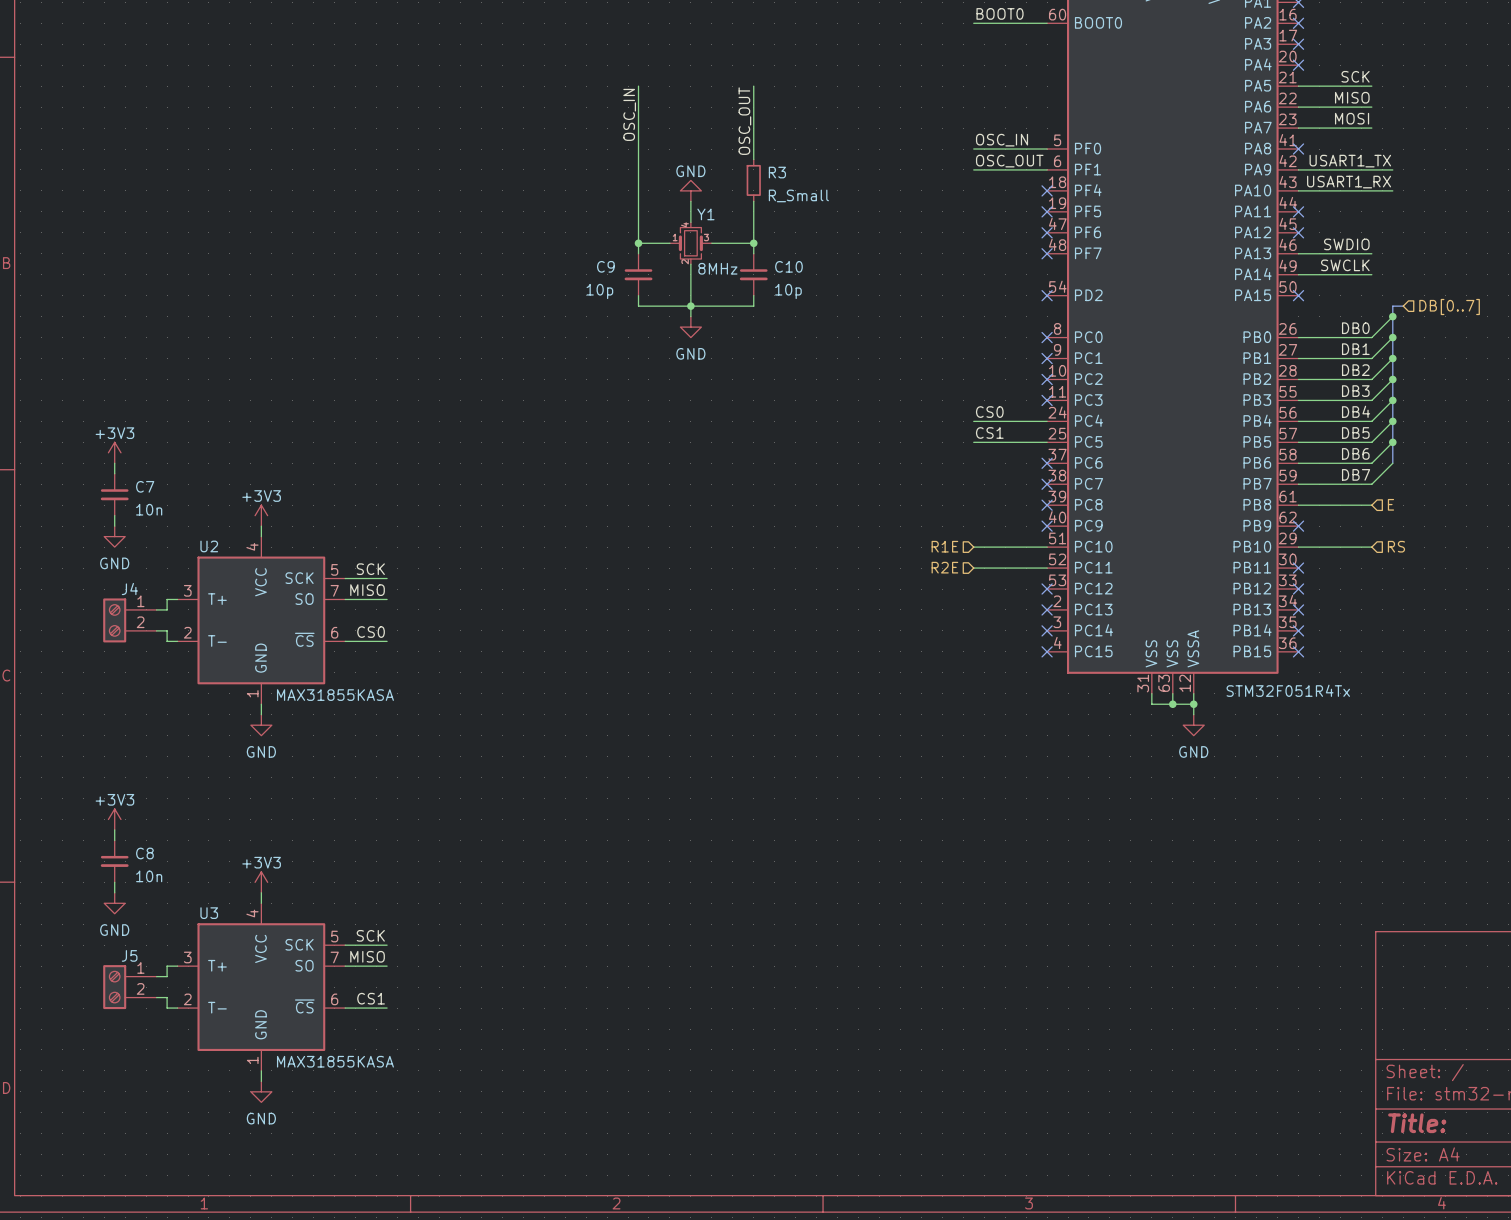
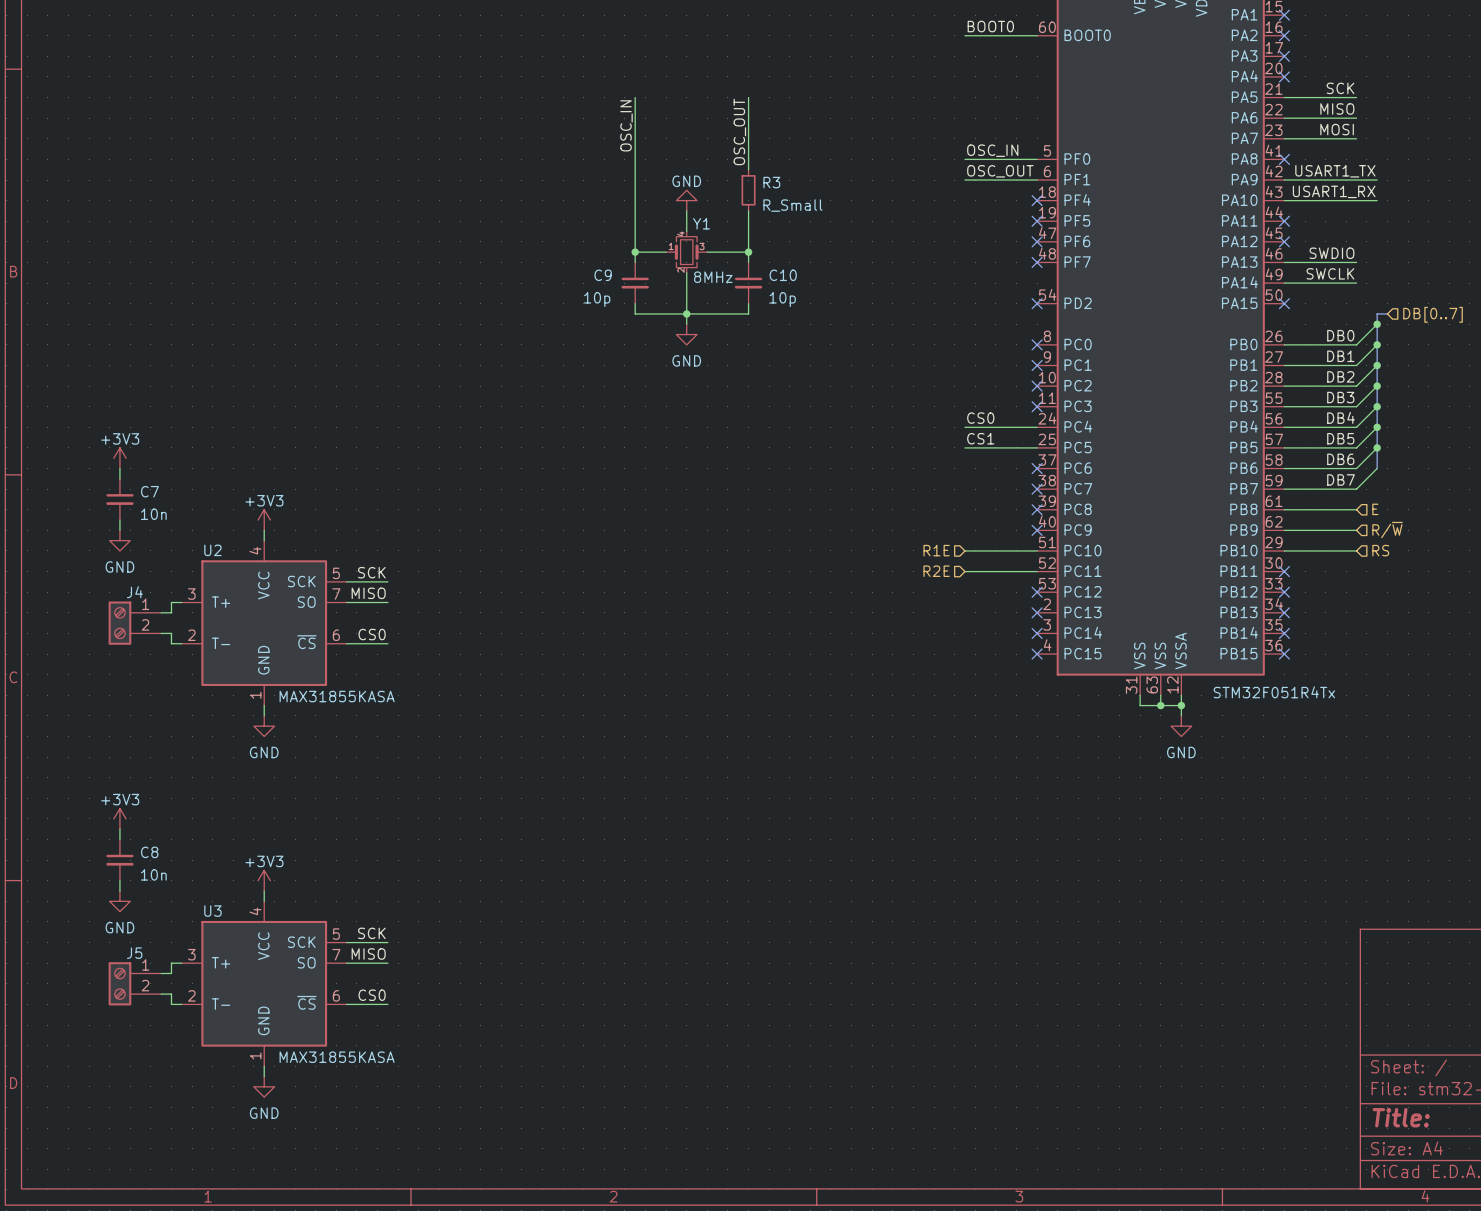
hierarchical label: none -> R/~{W} (1387, 530)
wire: none -> (1284, 530) (1356, 530)
no-connect mark: (1298, 526) -> none
label: CS1 (371, 998) -> CS0 (372, 995)

